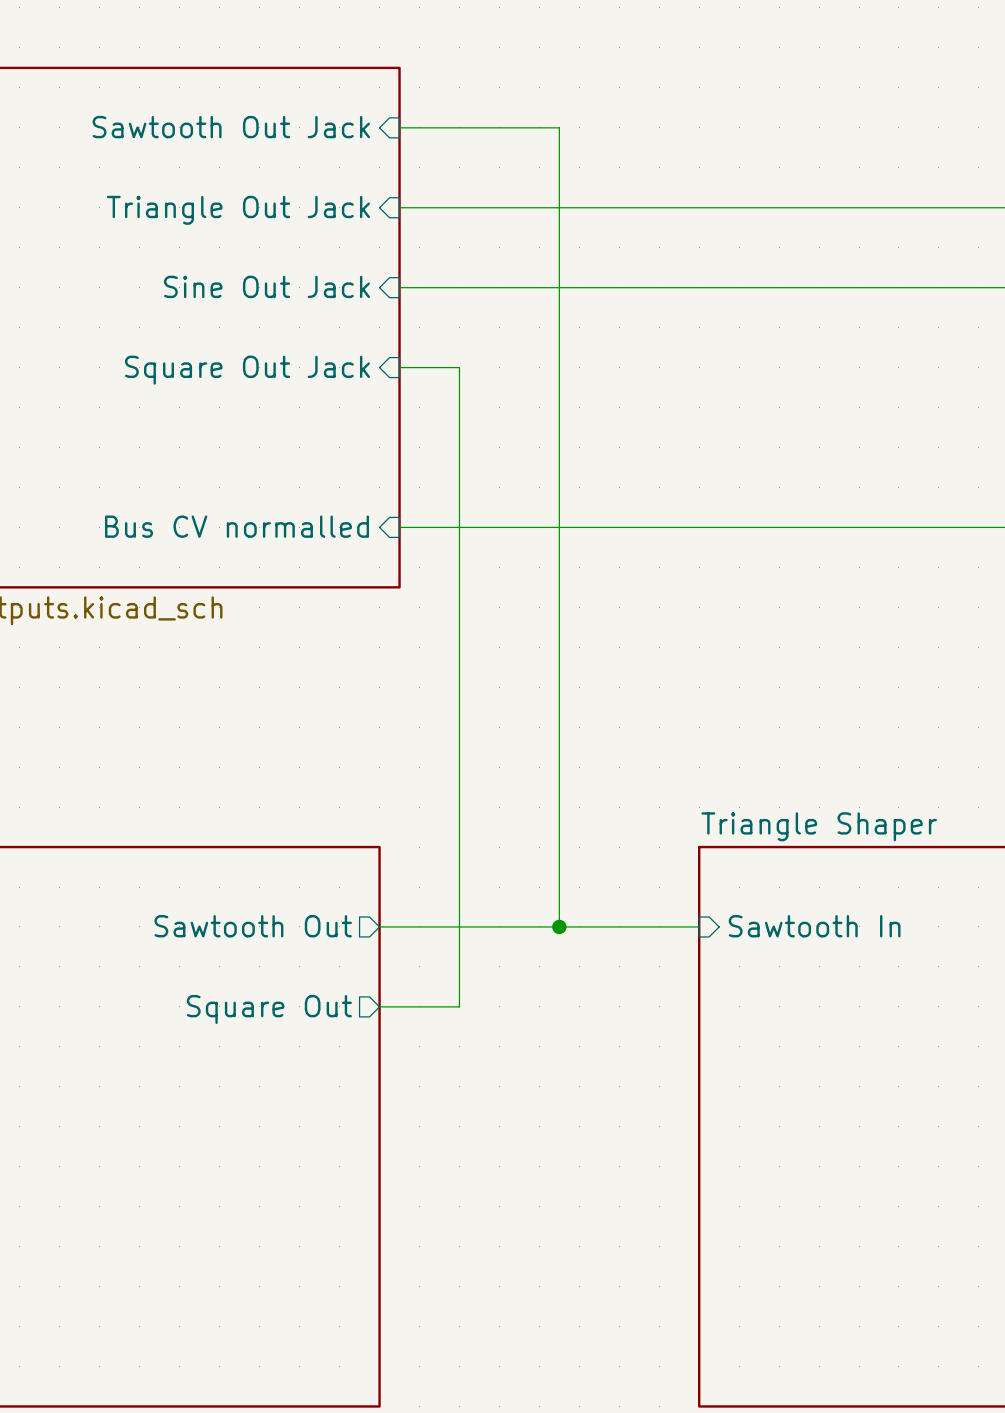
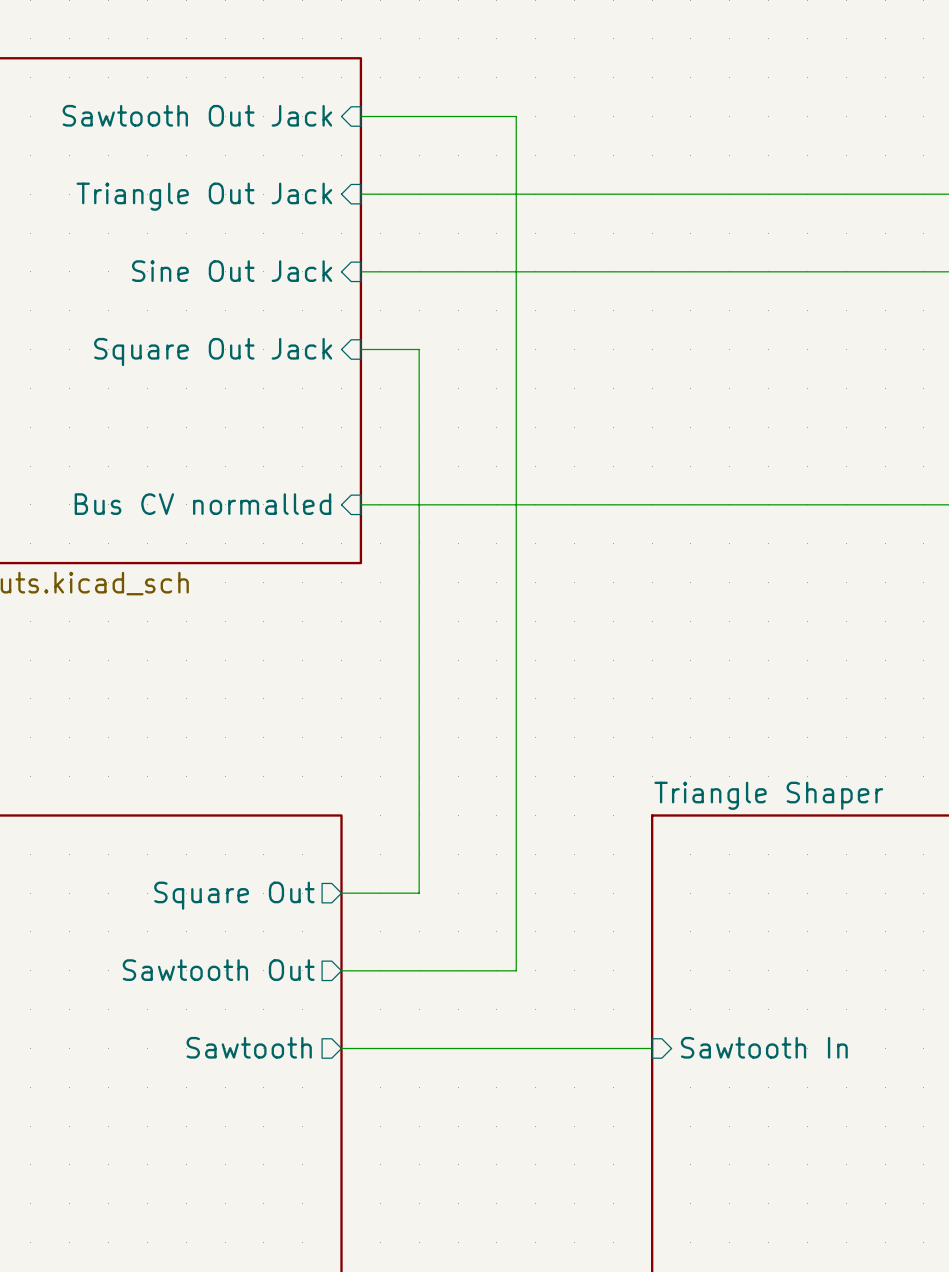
sheet pin: Sawtooth Out (253, 926) -> Square Out (234, 895)
junction: (559, 926) -> none
wire: (699, 926) (459, 926) (459, 1006) -> (516, 893) (516, 970) (419, 970)
sheet pin position: Sawtooth In (814, 926) -> Sawtooth In (764, 1047)
sheet pin: Square Out (269, 1009) -> Sawtooth Out (218, 970)
sheet pin: none -> Sawtooth (249, 1047)
wire: none -> (341, 1048) (652, 1048)

